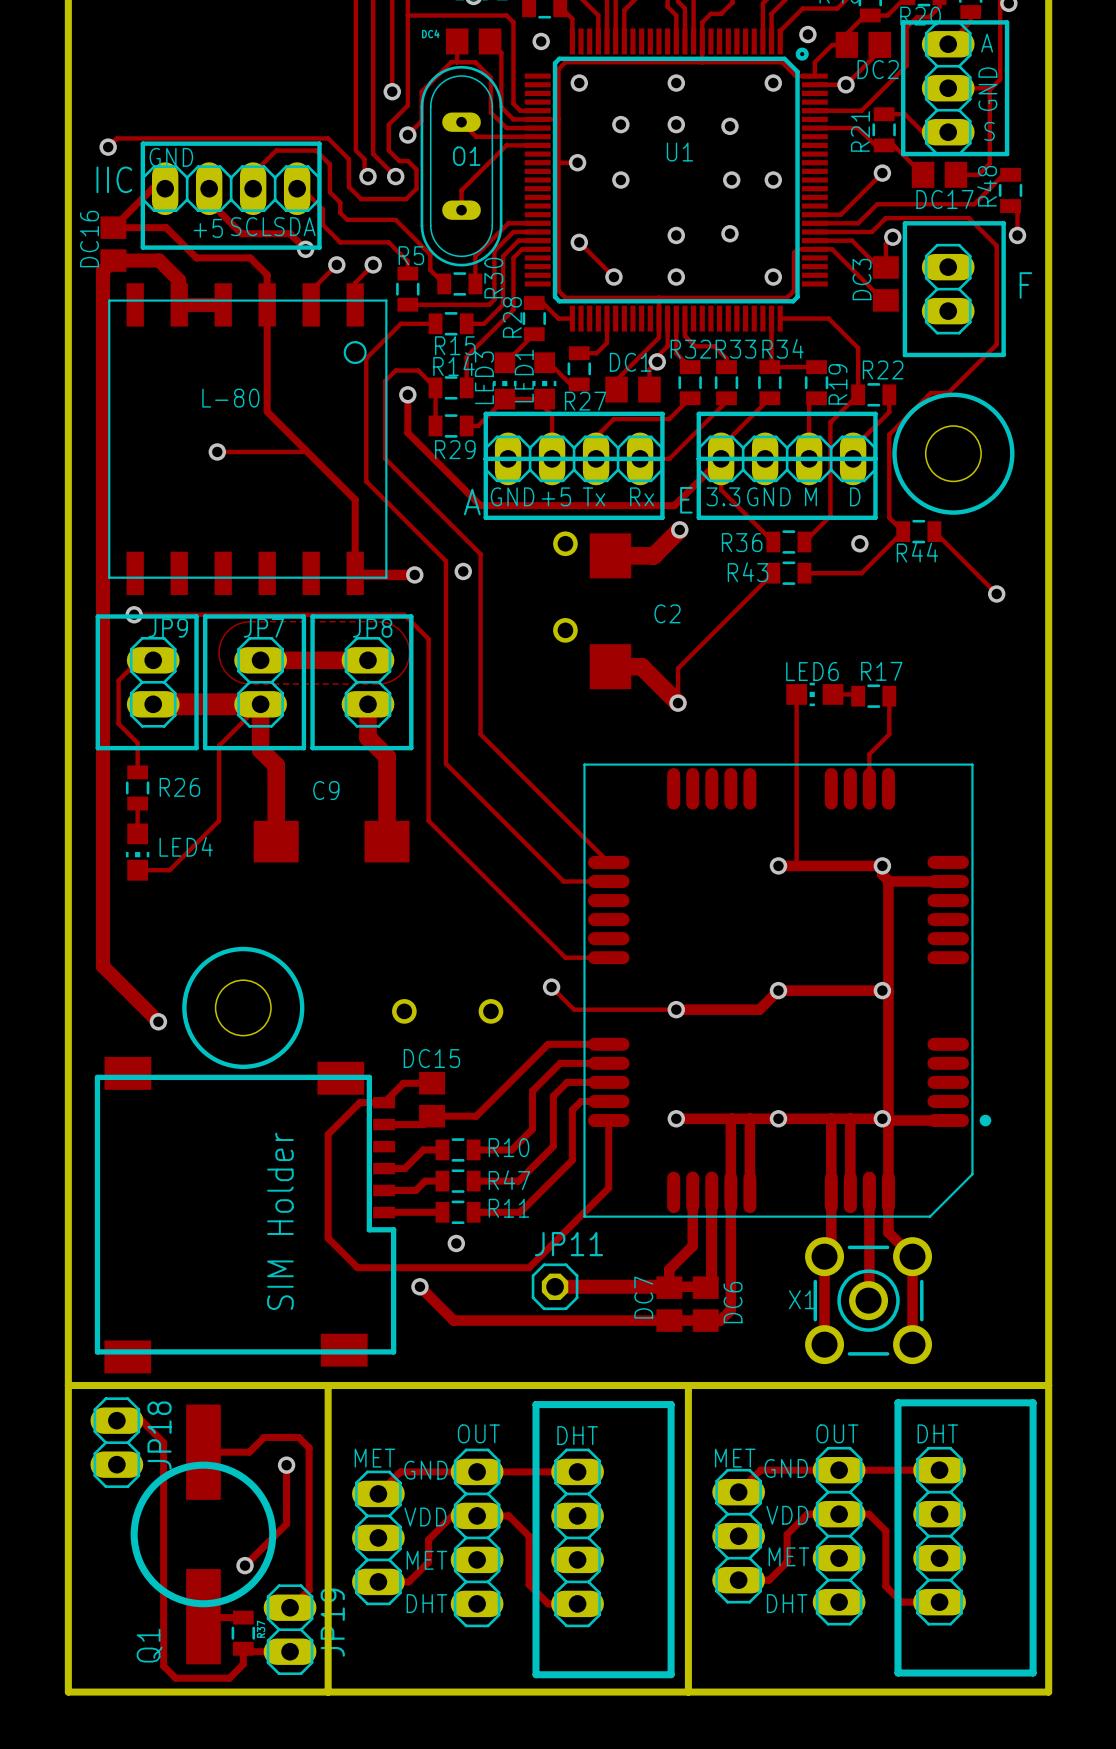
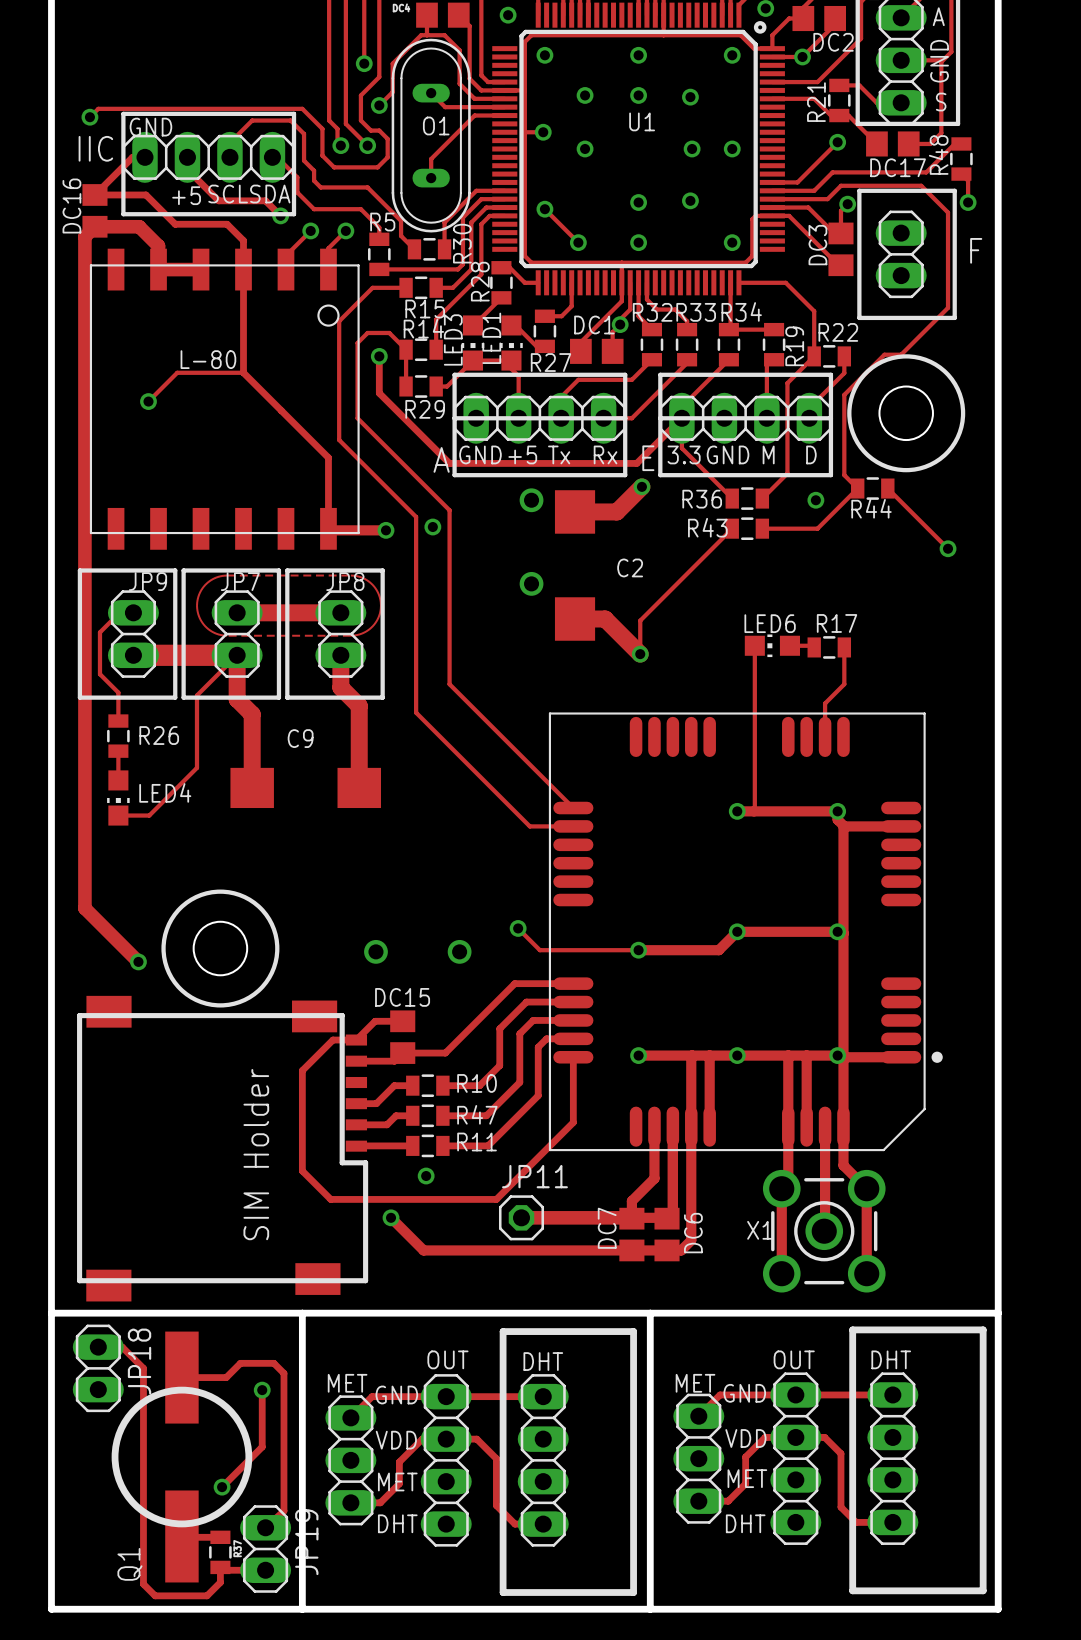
track: none -> (243, 372) (177, 372) (148, 401)
track: (217, 451) (305, 451) -> none
via position: (217, 451) -> (148, 401)
track: (134, 614) (404, 614) (428, 639) (428, 820) (565, 957) (608, 957) -> none
via: (134, 614) -> none

